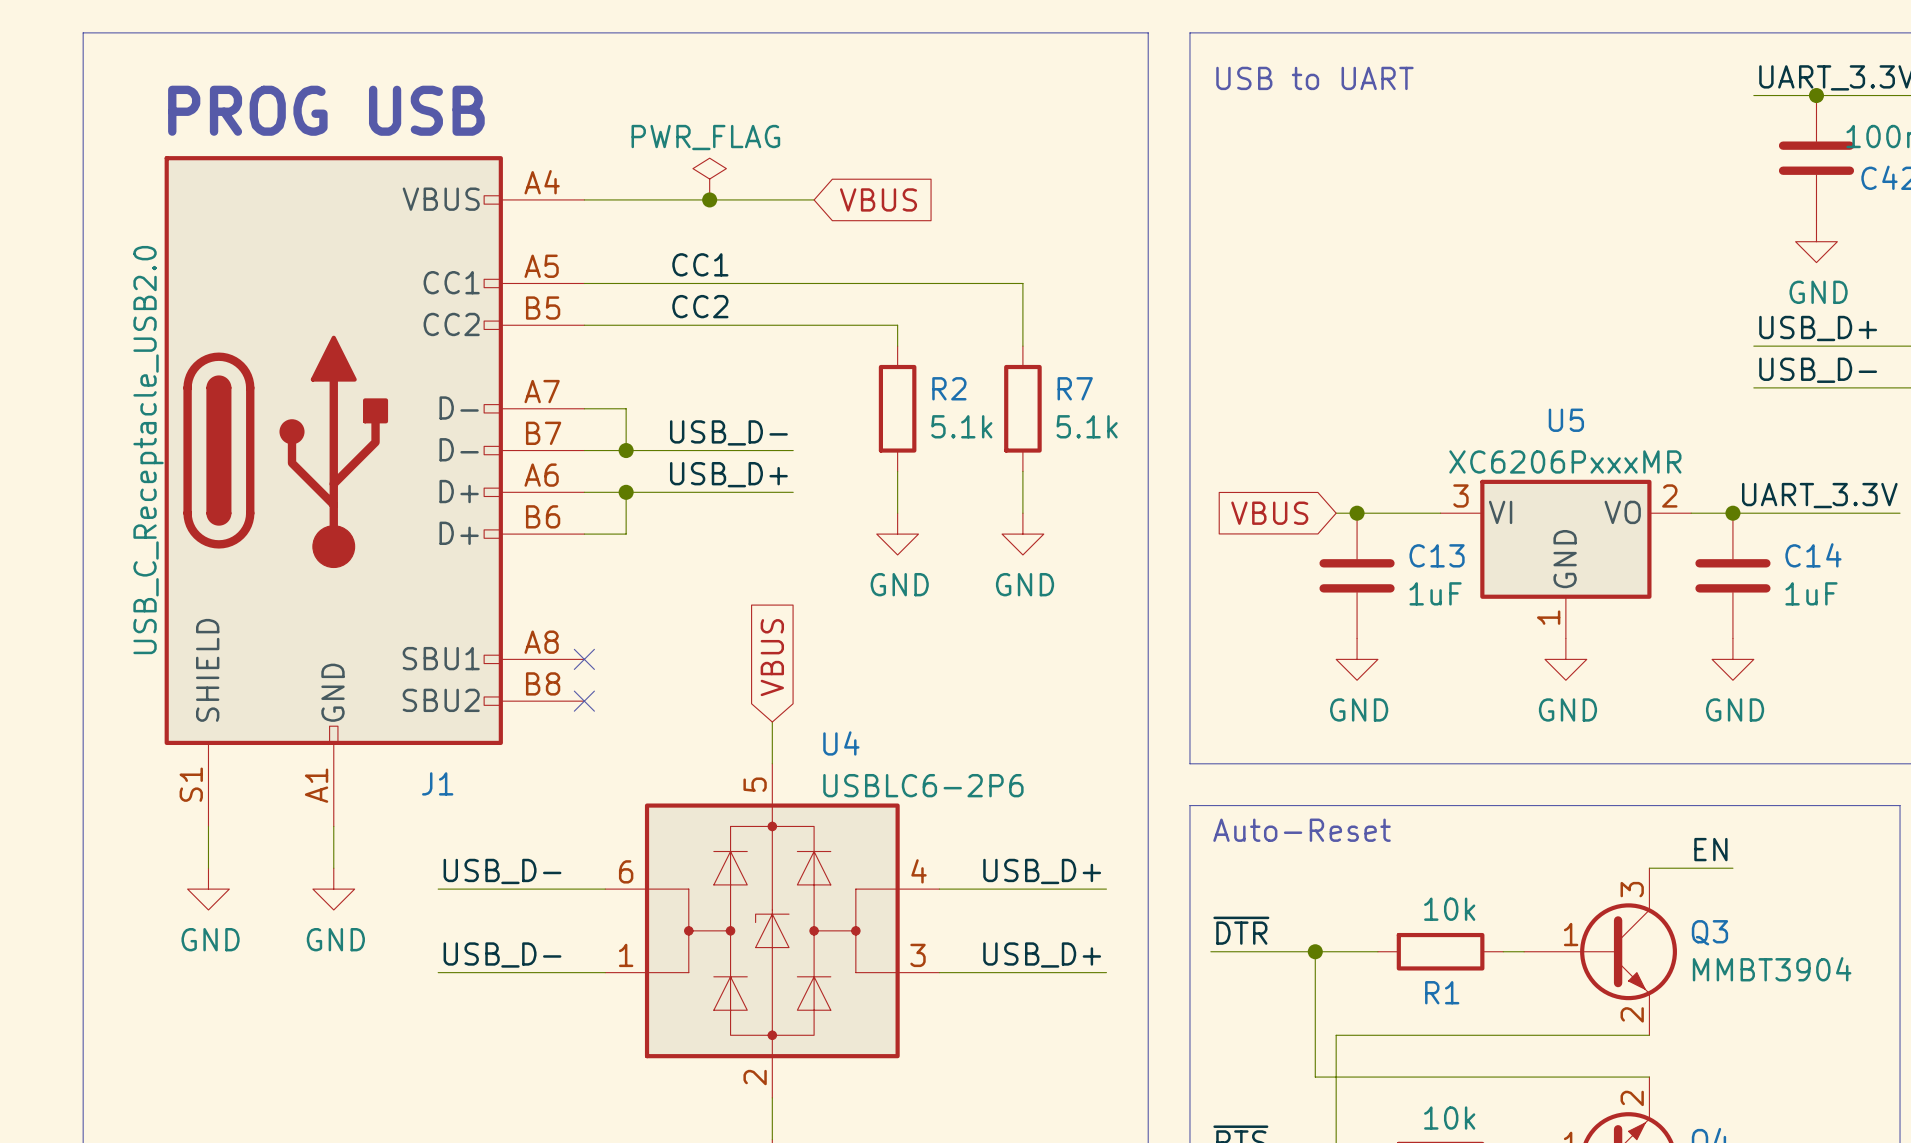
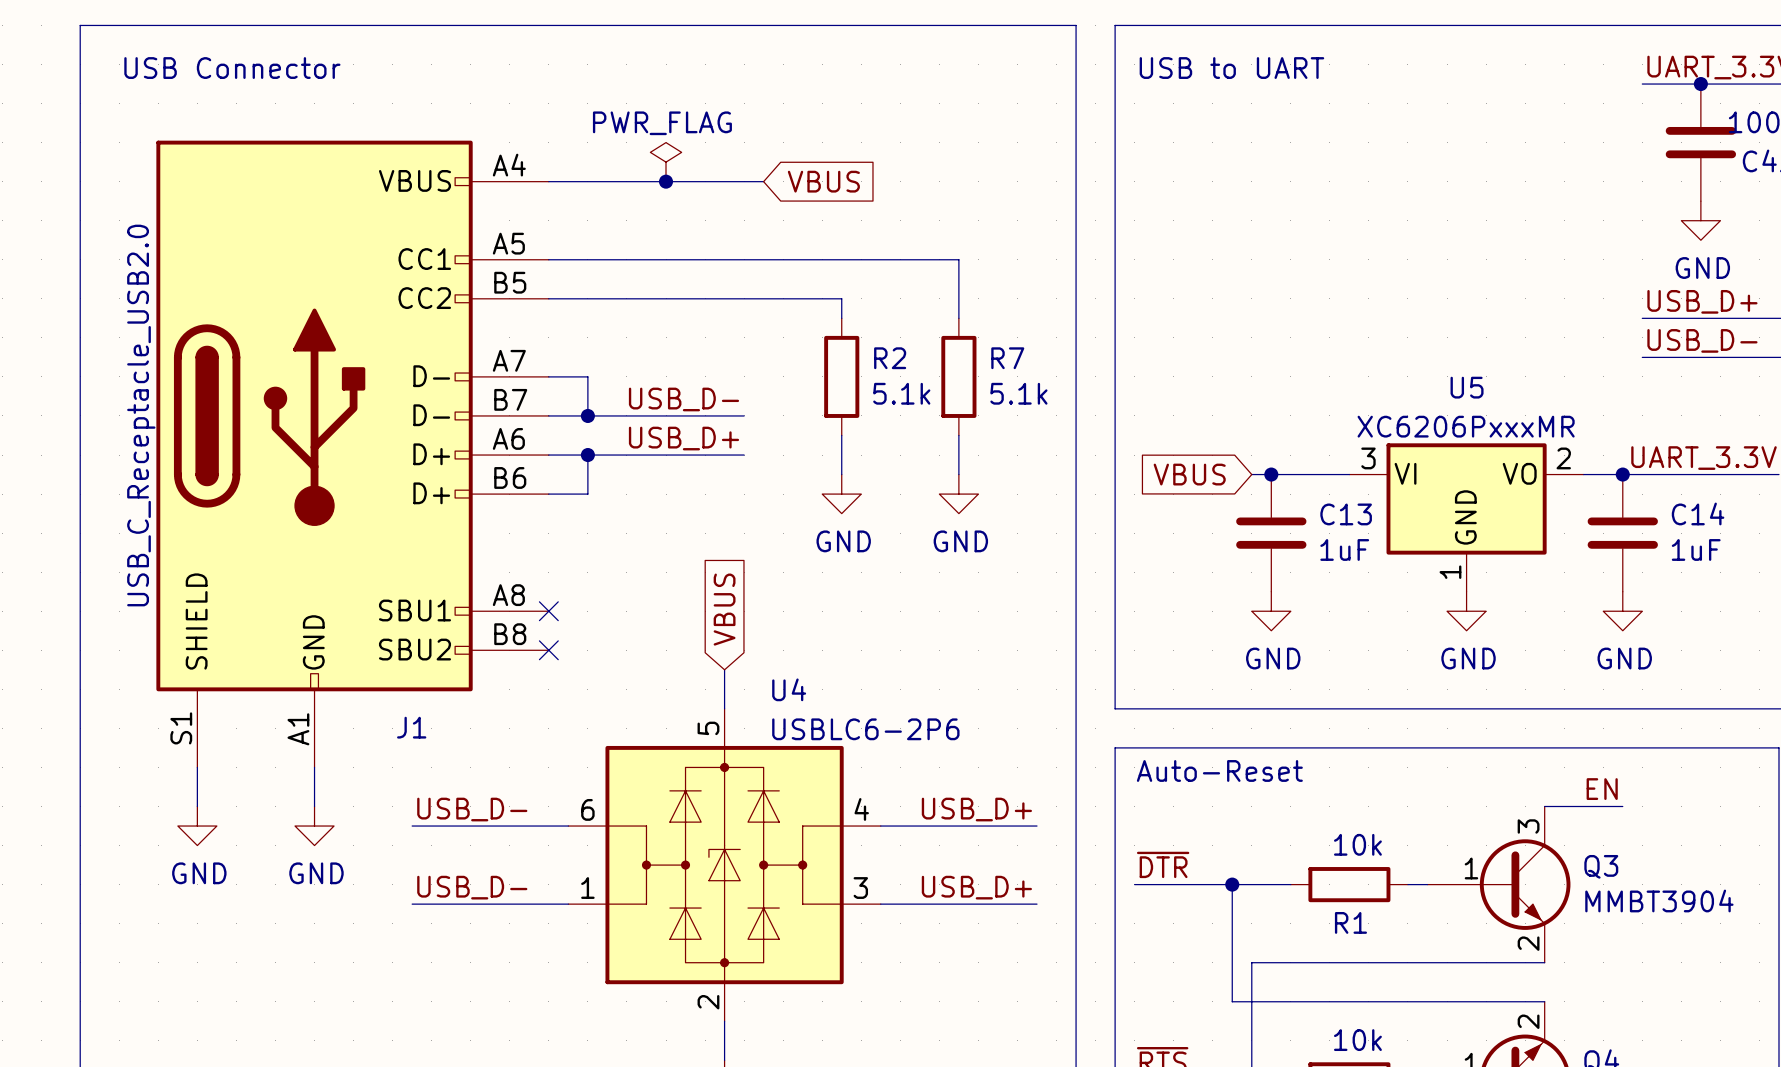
text: none -> USB Connector (232, 68)
text: PROG USB (326, 110) -> none
label: CC1 (700, 264) -> none
label: CC2 (700, 306) -> none

